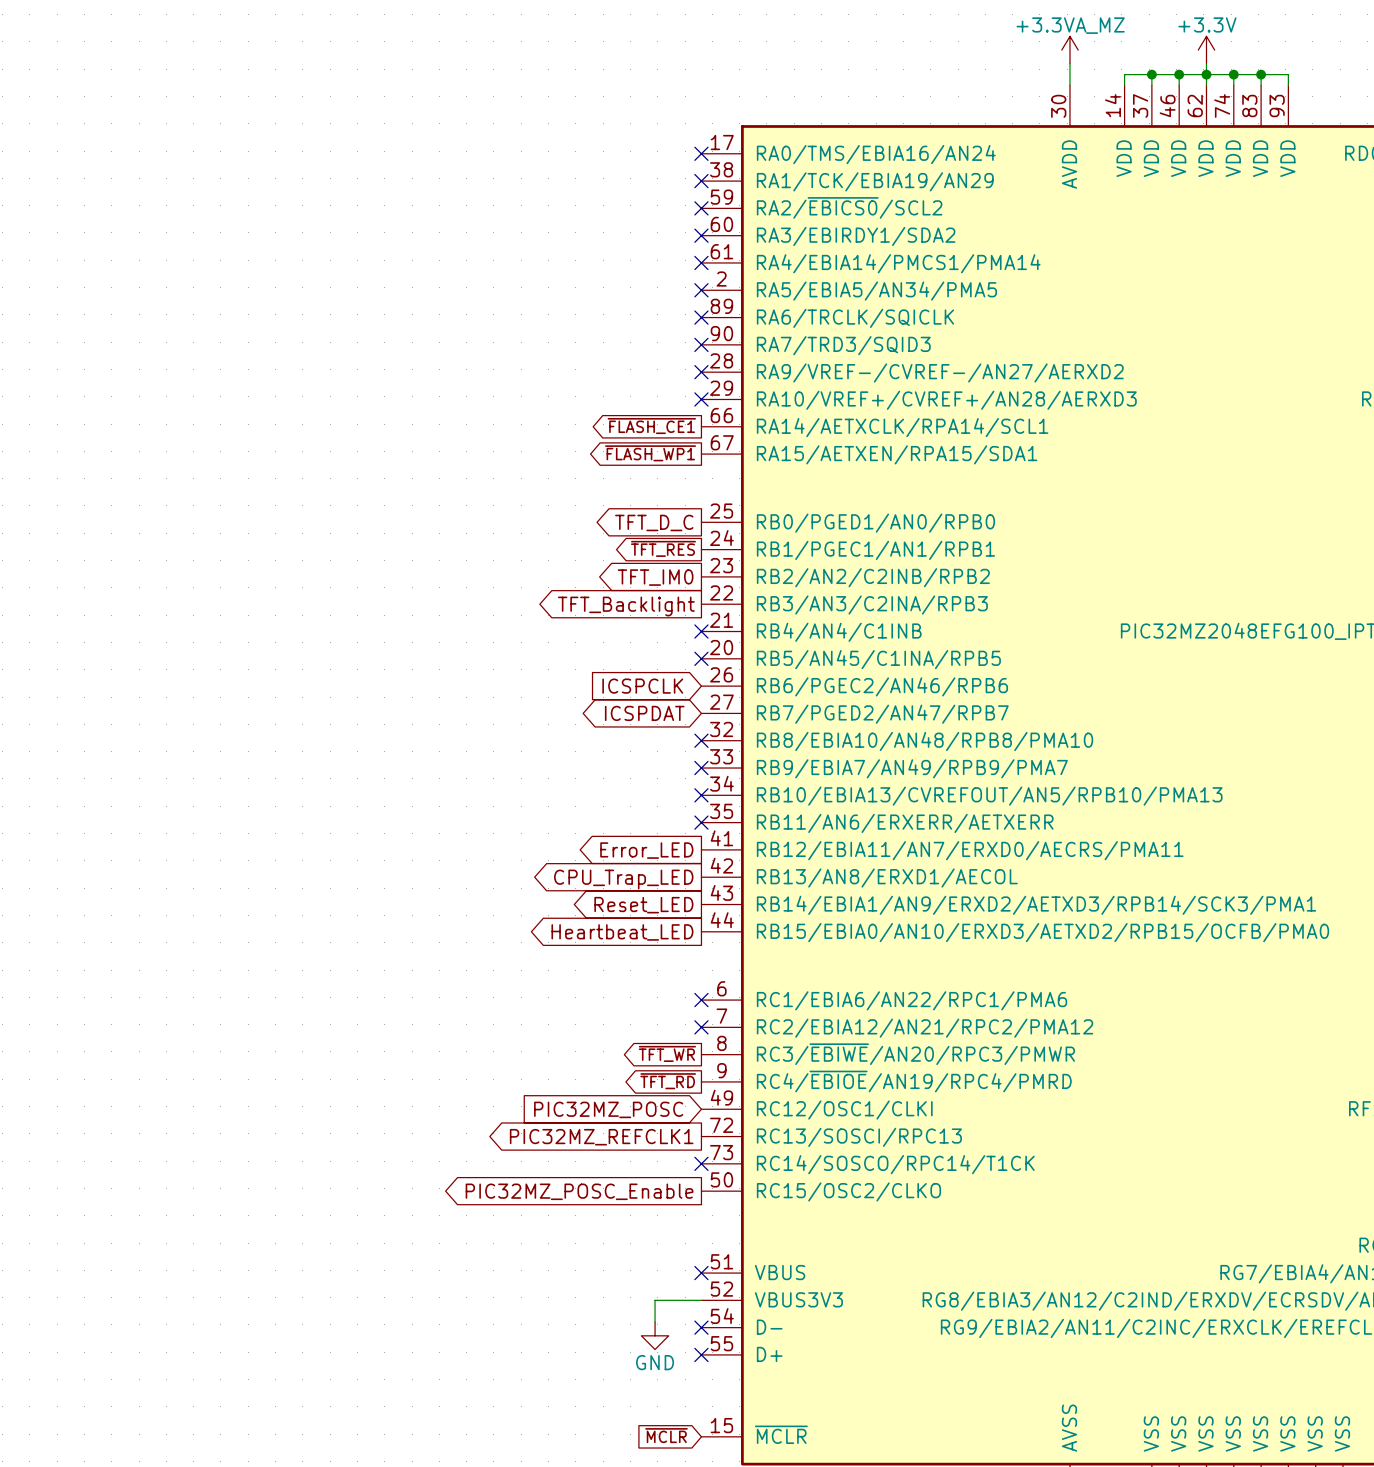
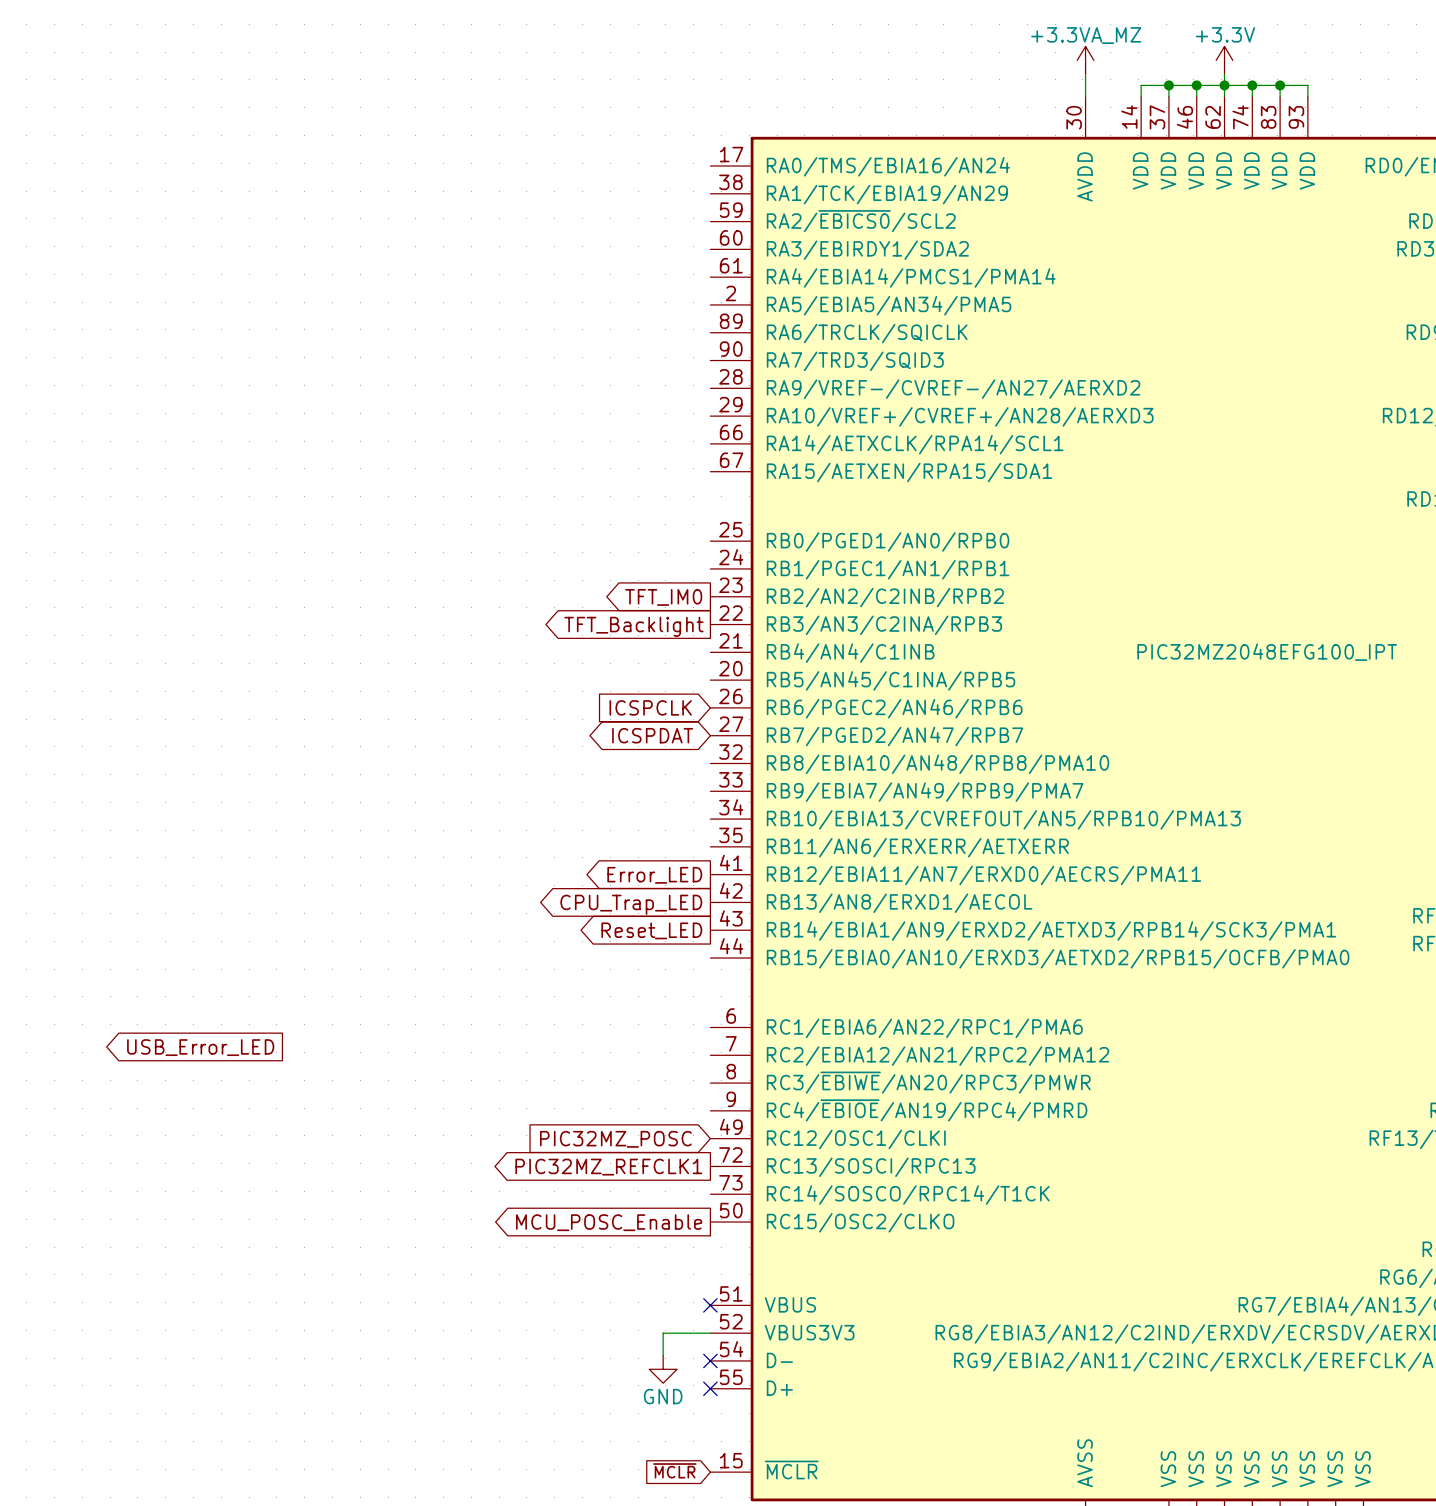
no-connect mark: (701, 153) -> none
no-connect mark: (701, 181) -> none
no-connect mark: (701, 208) -> none
no-connect mark: (701, 235) -> none
no-connect mark: (701, 262) -> none
no-connect mark: (701, 290) -> none
no-connect mark: (701, 317) -> none
no-connect mark: (701, 344) -> none
no-connect mark: (701, 372) -> none
no-connect mark: (701, 399) -> none
global label: ~{FLASH_CE1} (651, 426) -> none
global label: ~{FLASH_WP1} (650, 453) -> none
global label: TFT_D_C (654, 522) -> none
global label: ~{TFT_RES} (663, 548) -> none
no-connect mark: (701, 631) -> none
no-connect mark: (701, 658) -> none
no-connect mark: (701, 740) -> none
no-connect mark: (701, 768) -> none
no-connect mark: (701, 795) -> none
no-connect mark: (701, 822) -> none
global label: Heartbeat_LED (622, 932) -> none
no-connect mark: (701, 1000) -> none
global label: none -> USB_Error_LED (200, 1047)
no-connect mark: (701, 1027) -> none
global label: ~{TFT_WR} (667, 1053) -> none
global label: ~{TFT_RD} (668, 1081) -> none
no-connect mark: (701, 1163) -> none
global label: PIC32MZ_POSC_Enable (579, 1191) -> MCU_POSC_Enable (609, 1222)

